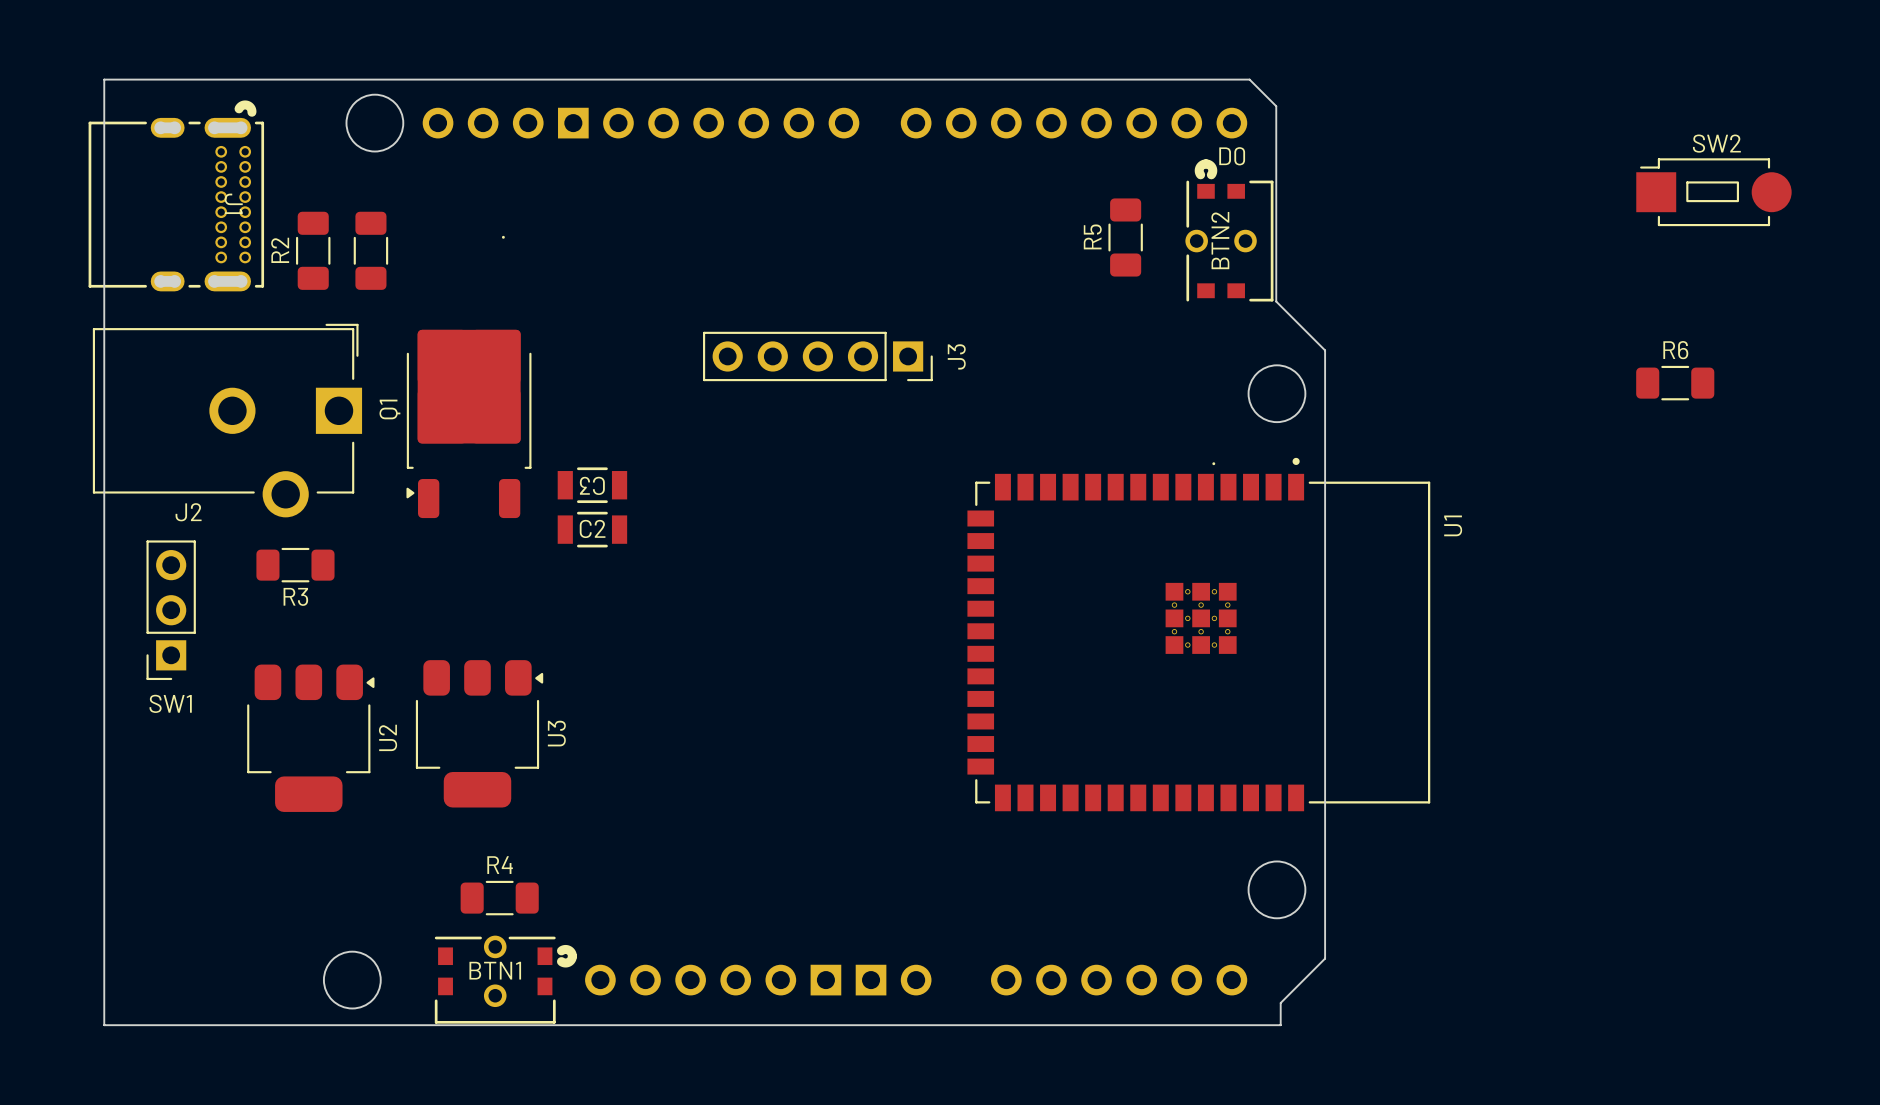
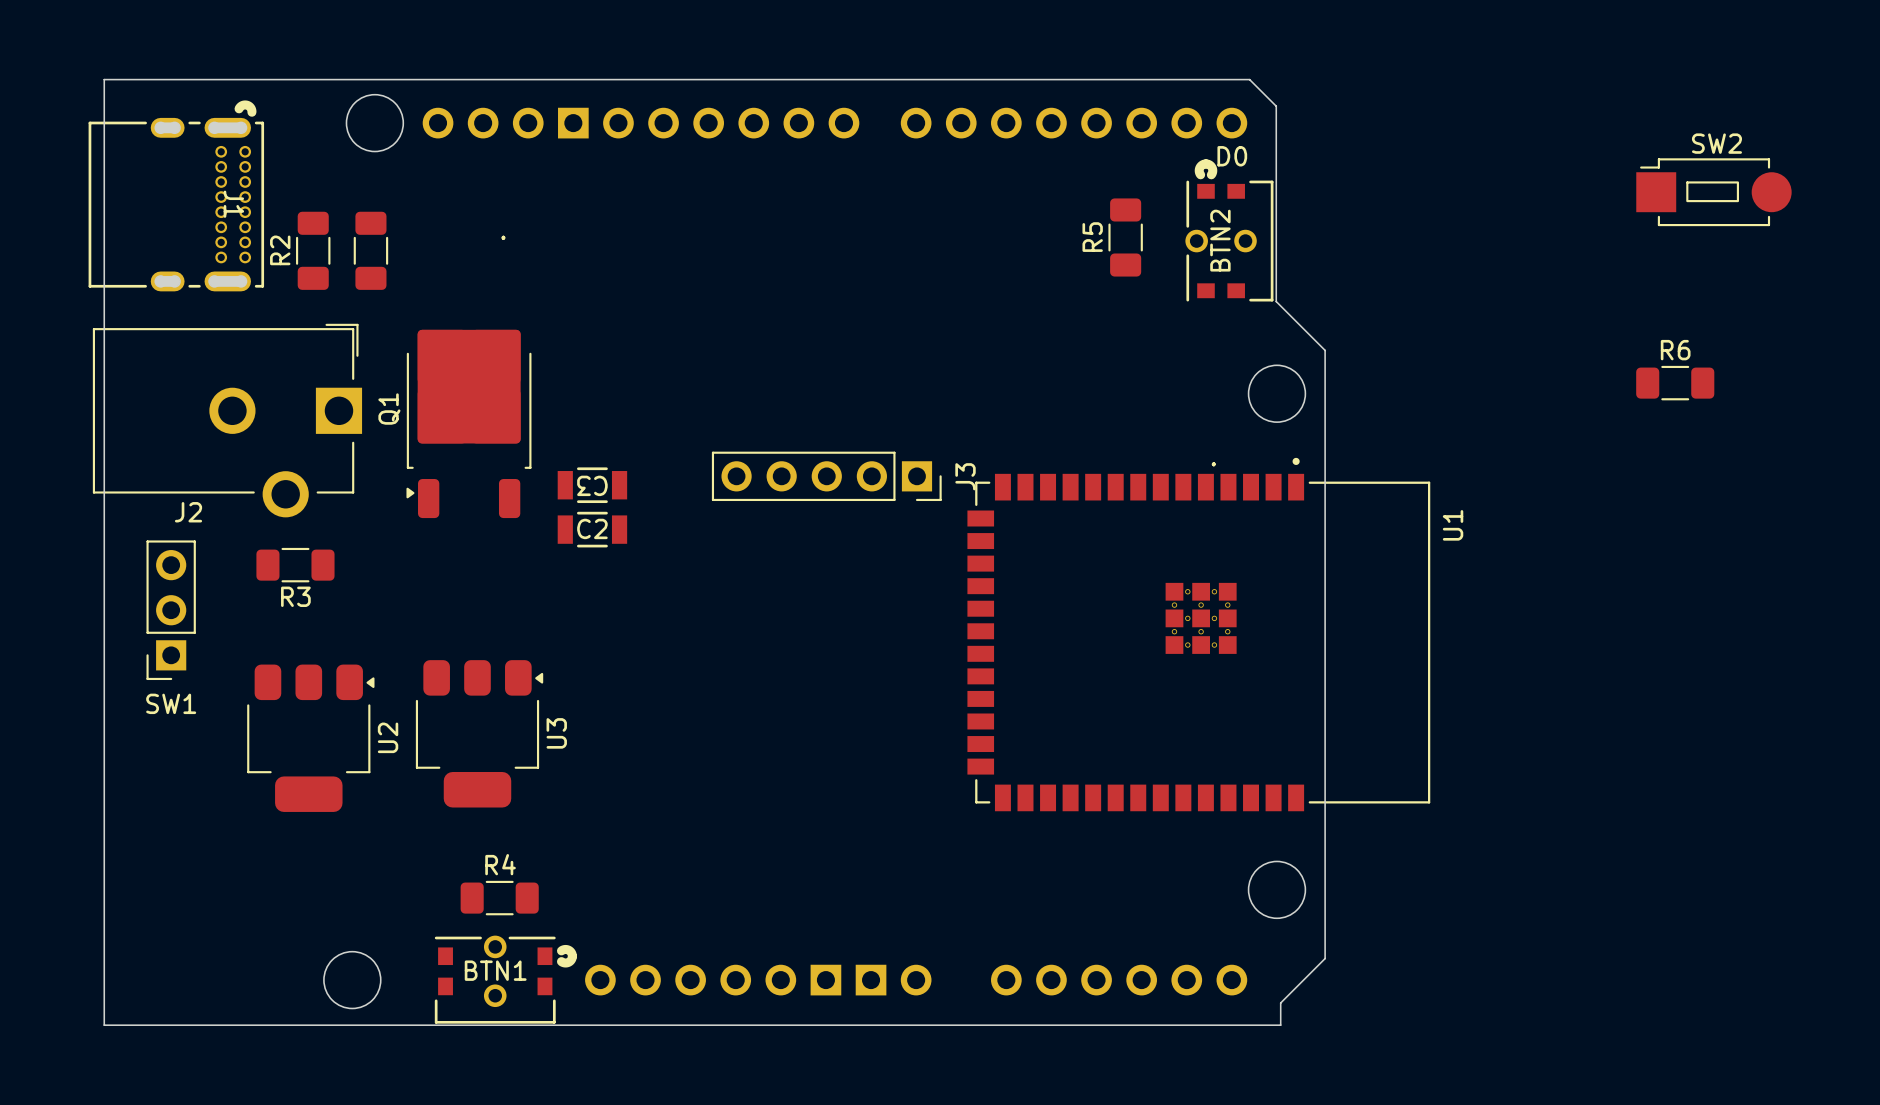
J3 position: (817, 356) -> (826, 476)

